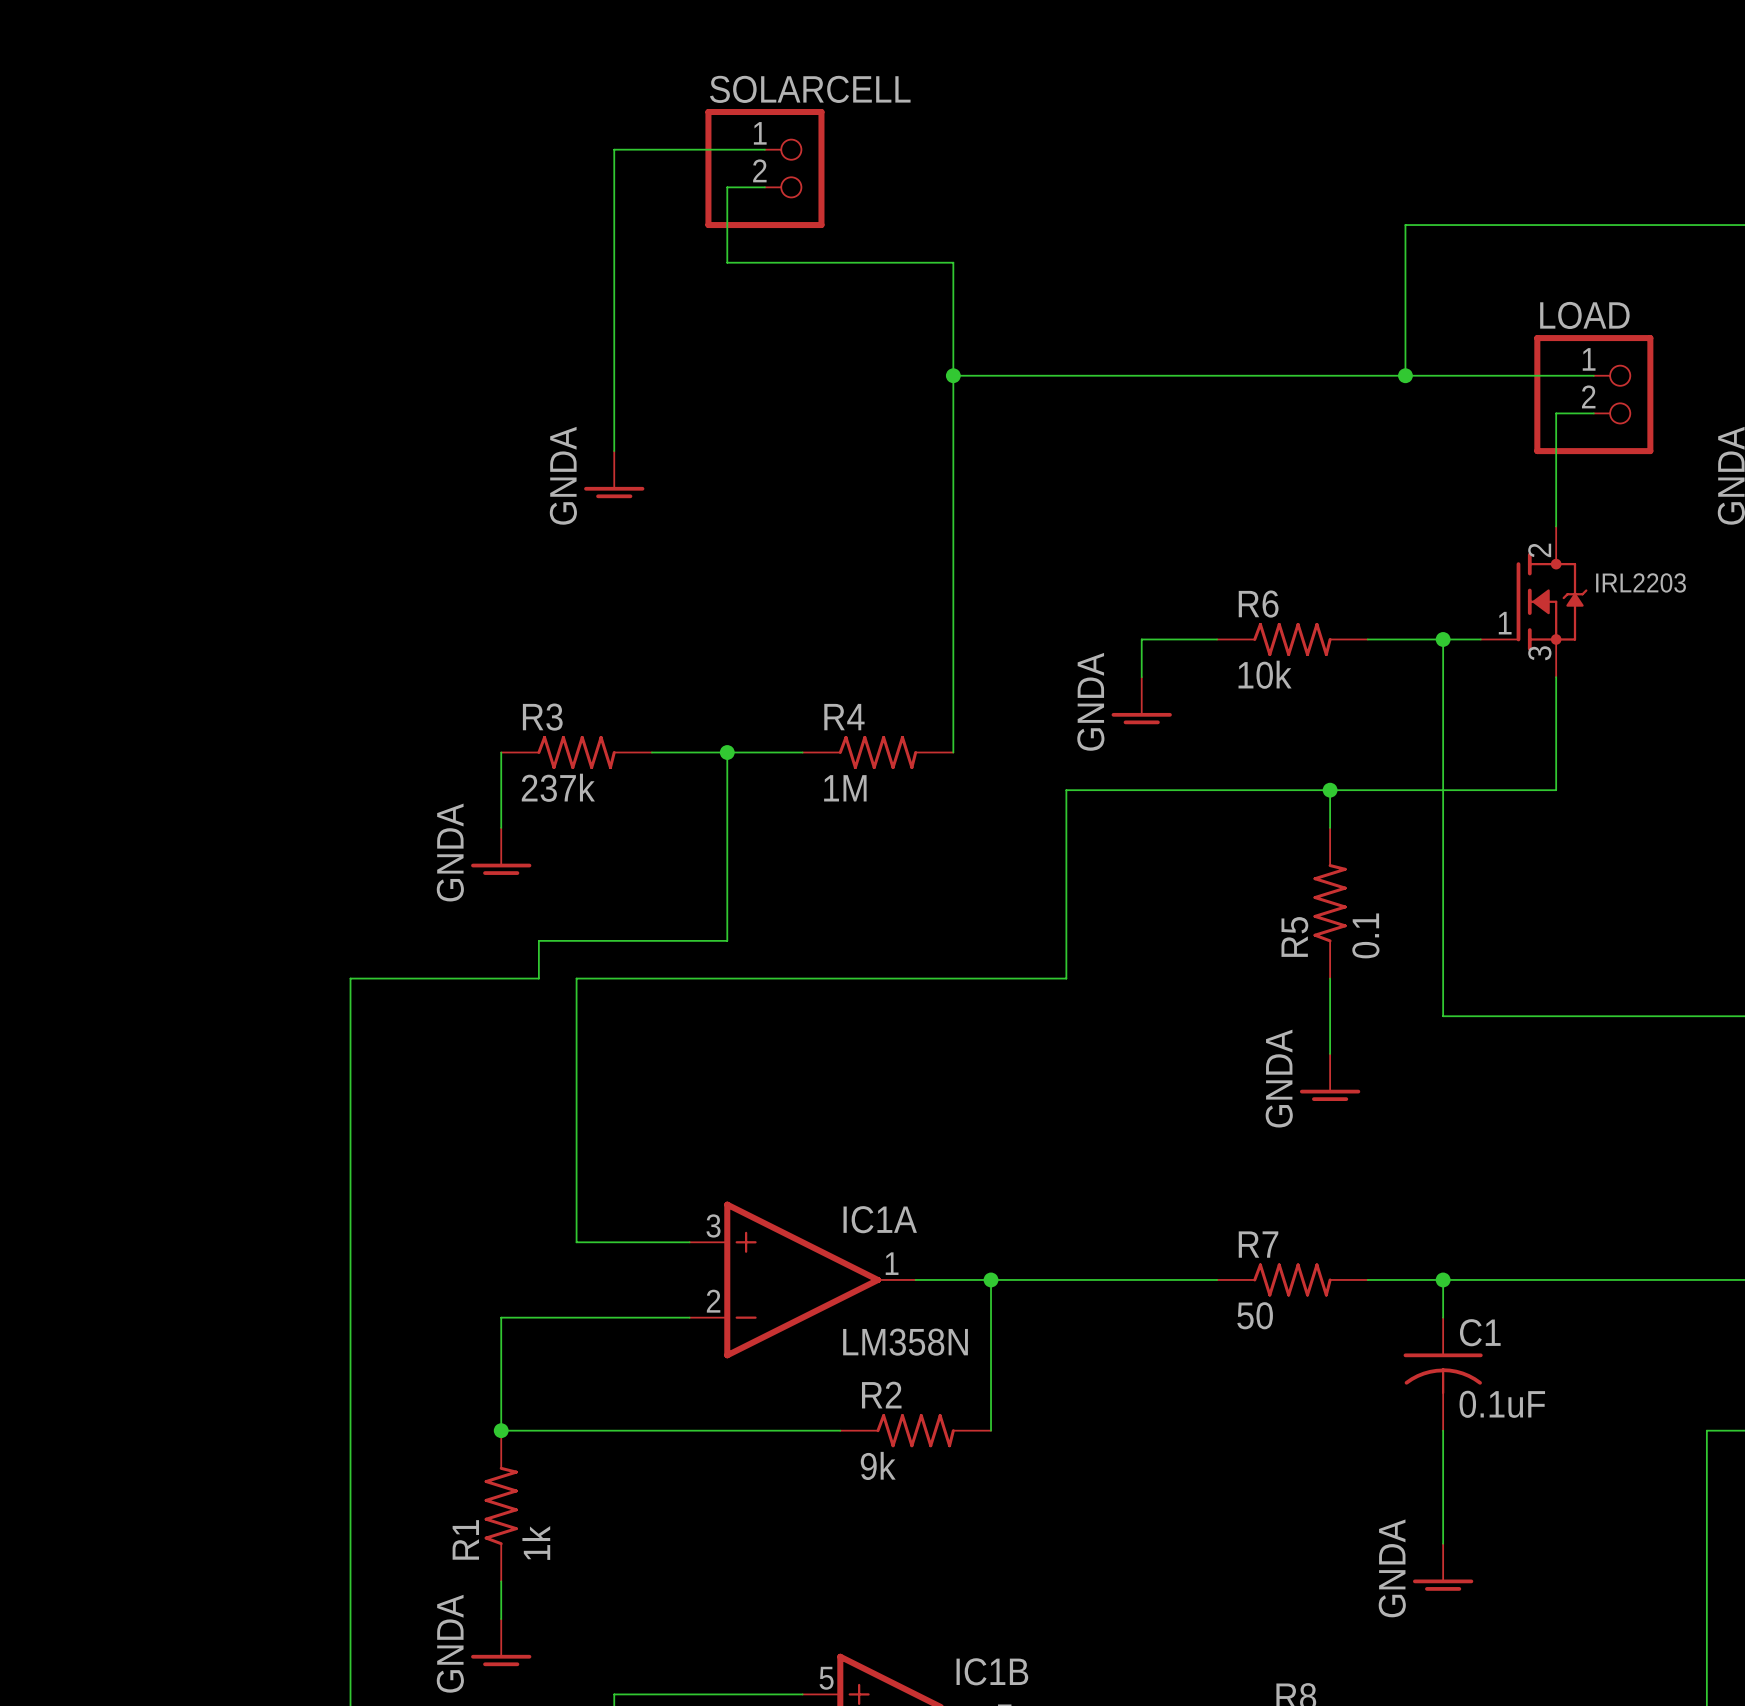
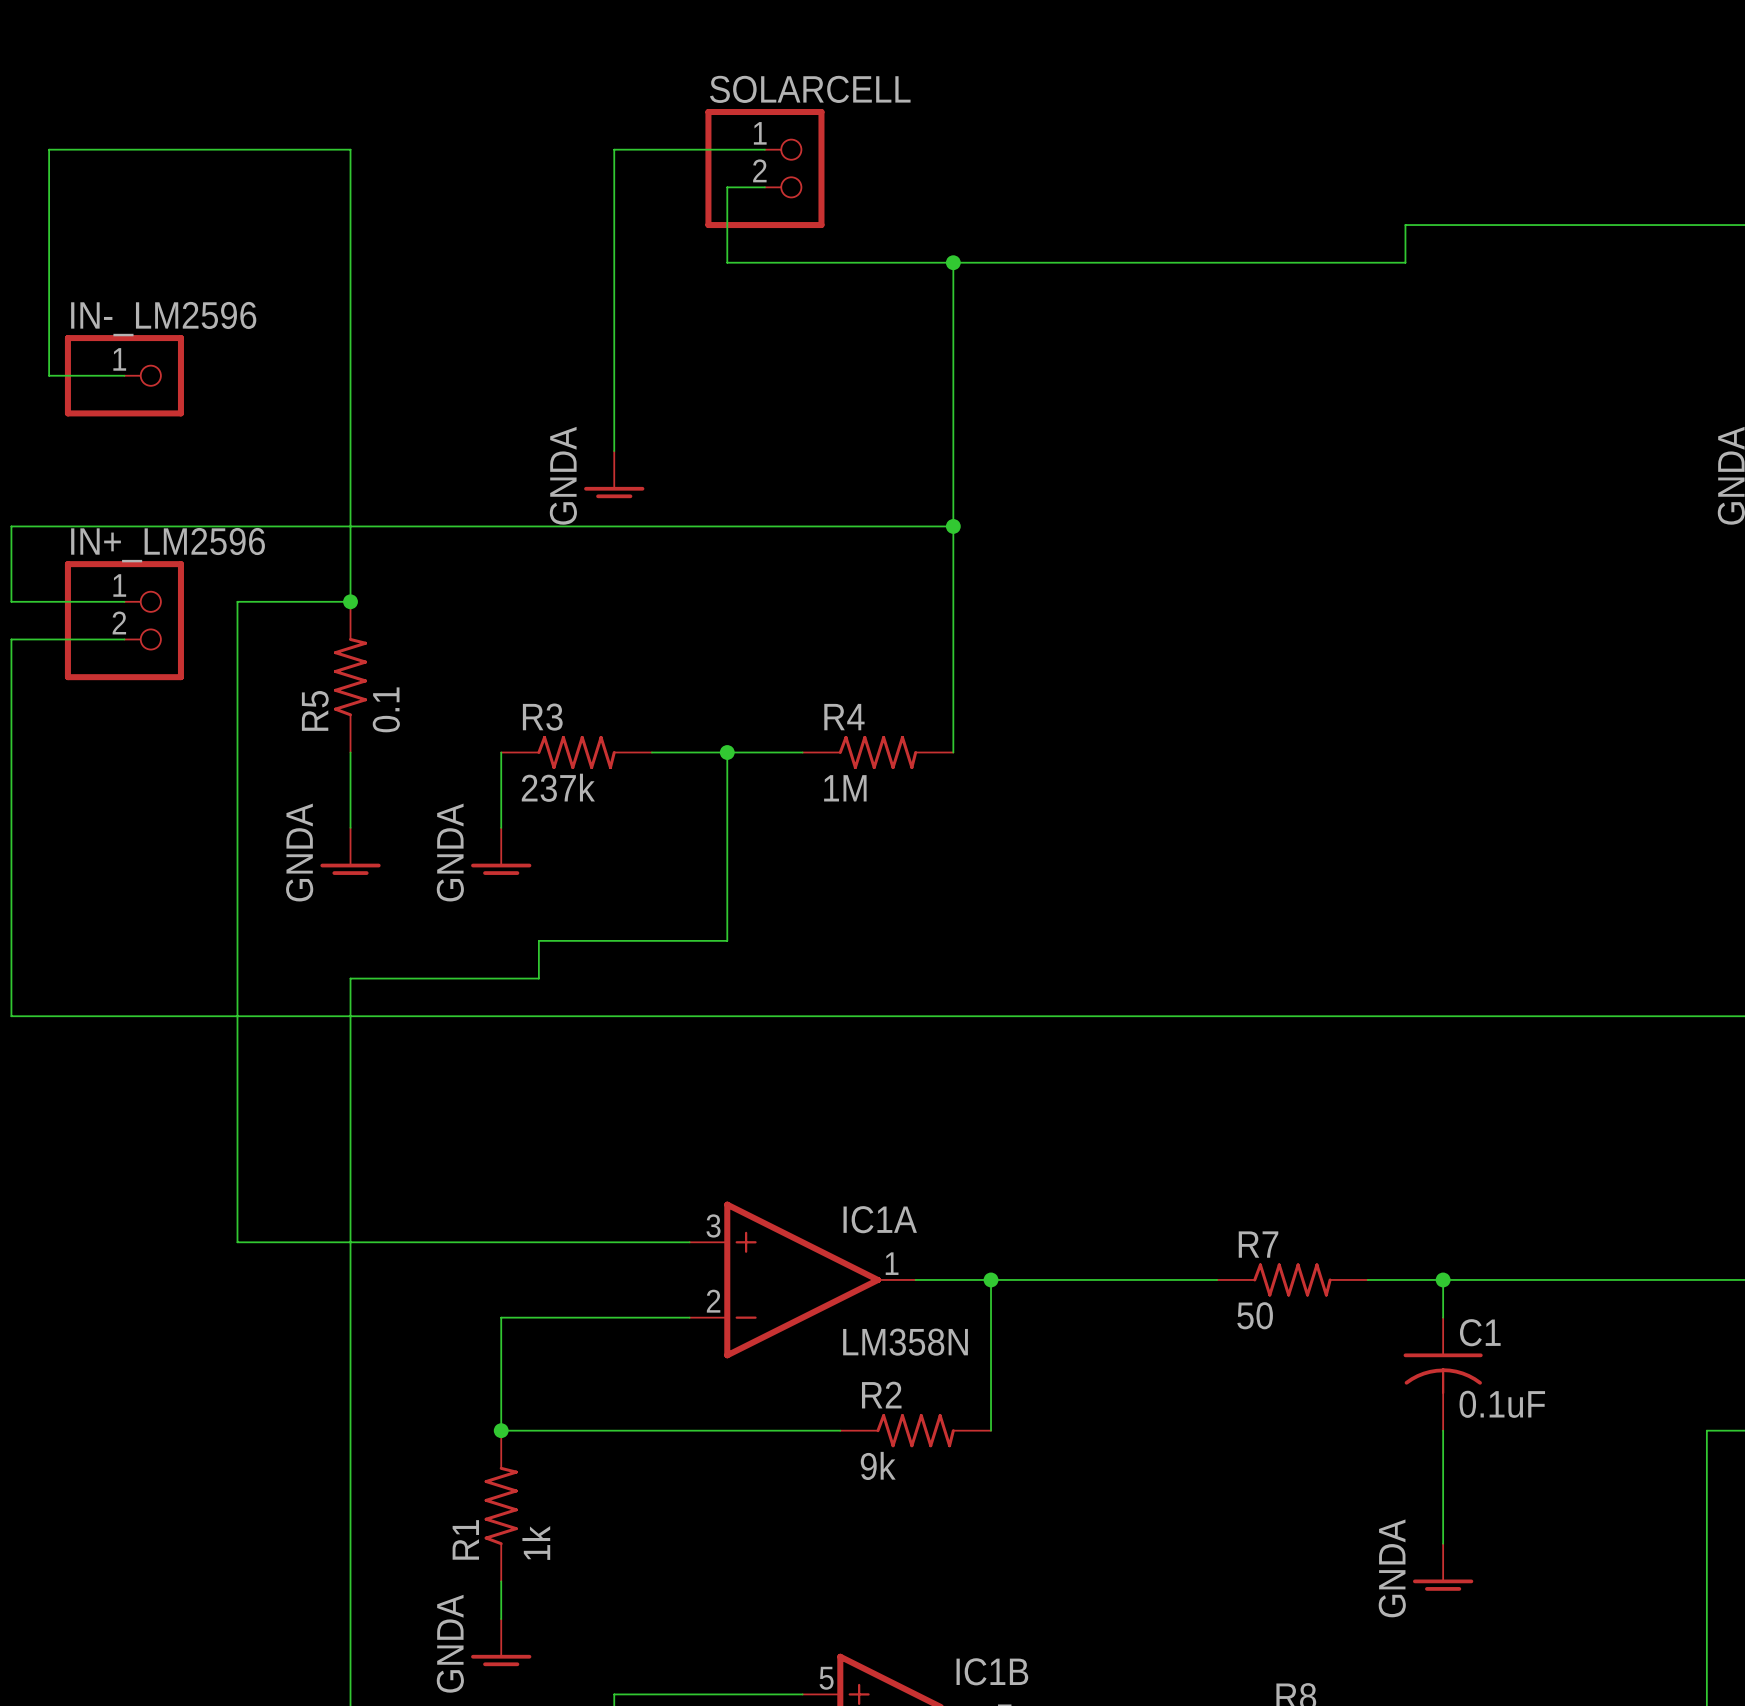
junction: none -> (953, 262)
wire: (1405, 262) (1405, 375) -> (1405, 262) (953, 262)
IN-_LM2596: none -> (124, 375)
wire: (953, 375) (1593, 375) -> none
junction: (953, 375) -> none
junction: (1405, 375) -> none
LOAD: (1593, 394) -> none
wire: (1593, 413) (1556, 413) (1556, 526) -> none
wire: none -> (953, 526) (11, 526) (11, 601) (124, 601)
junction: none -> (953, 526)
junction: none -> (350, 601)
IRL2203: (1534, 601) -> none
IN+_LM2596: none -> (124, 620)
wire: (1217, 639) (1141, 639) (1141, 677) -> none
R6: 10k (1292, 639) -> none
wire: (1367, 639) (1480, 639) -> none
wire: (1443, 639) (1443, 1016) -> (124, 639) (11, 639) (11, 1016) (1443, 1016)
junction: (1443, 639) -> none
wire: (1556, 677) (1556, 790) (1066, 790) (1066, 978) (576, 978) (576, 1242) -> (124, 375) (49, 375) (49, 149) (350, 149) (350, 601) (237, 601) (237, 1242) (576, 1242)
power symbol: GNDA (1141, 700) -> none
wire: none -> (350, 752) (350, 827)
wire: (1330, 790) (1330, 827) -> none
junction: (1330, 790) -> none
power symbol: none -> GNDA (350, 851)
R5 position: (1330, 903) -> (350, 677)
wire: (1330, 978) (1330, 1053) -> none
power symbol: GNDA (1330, 1077) -> none

